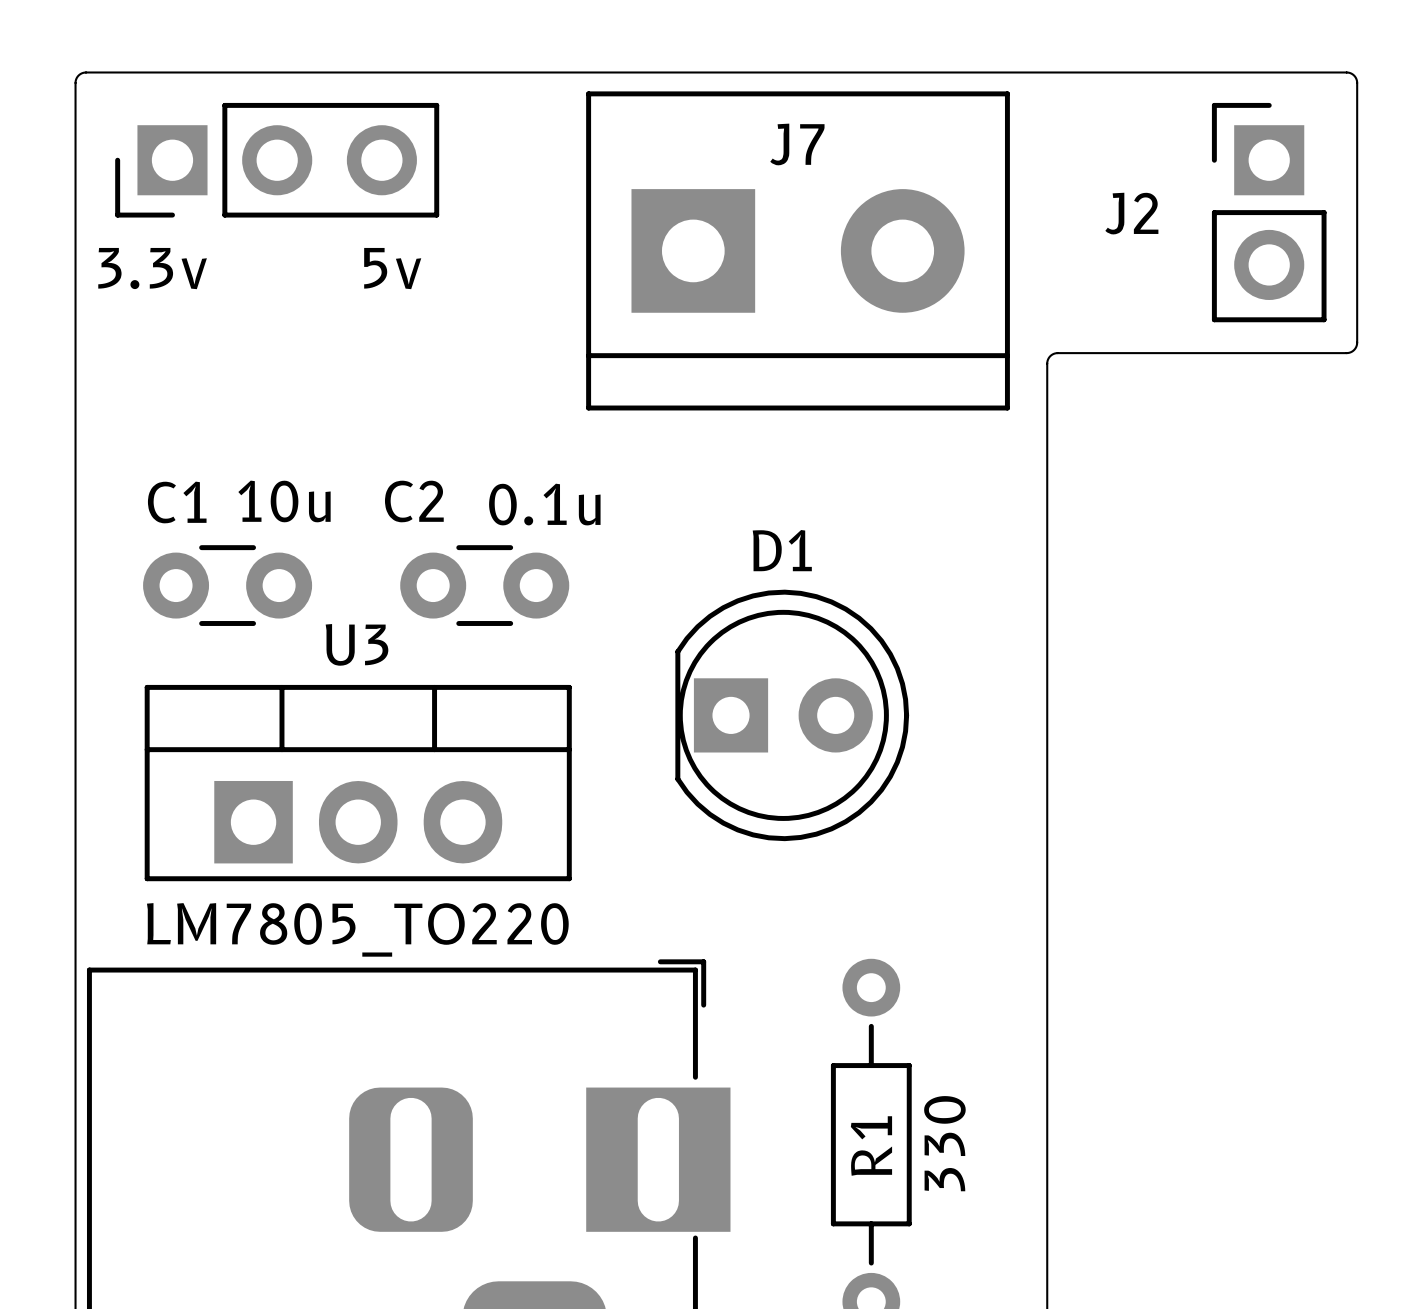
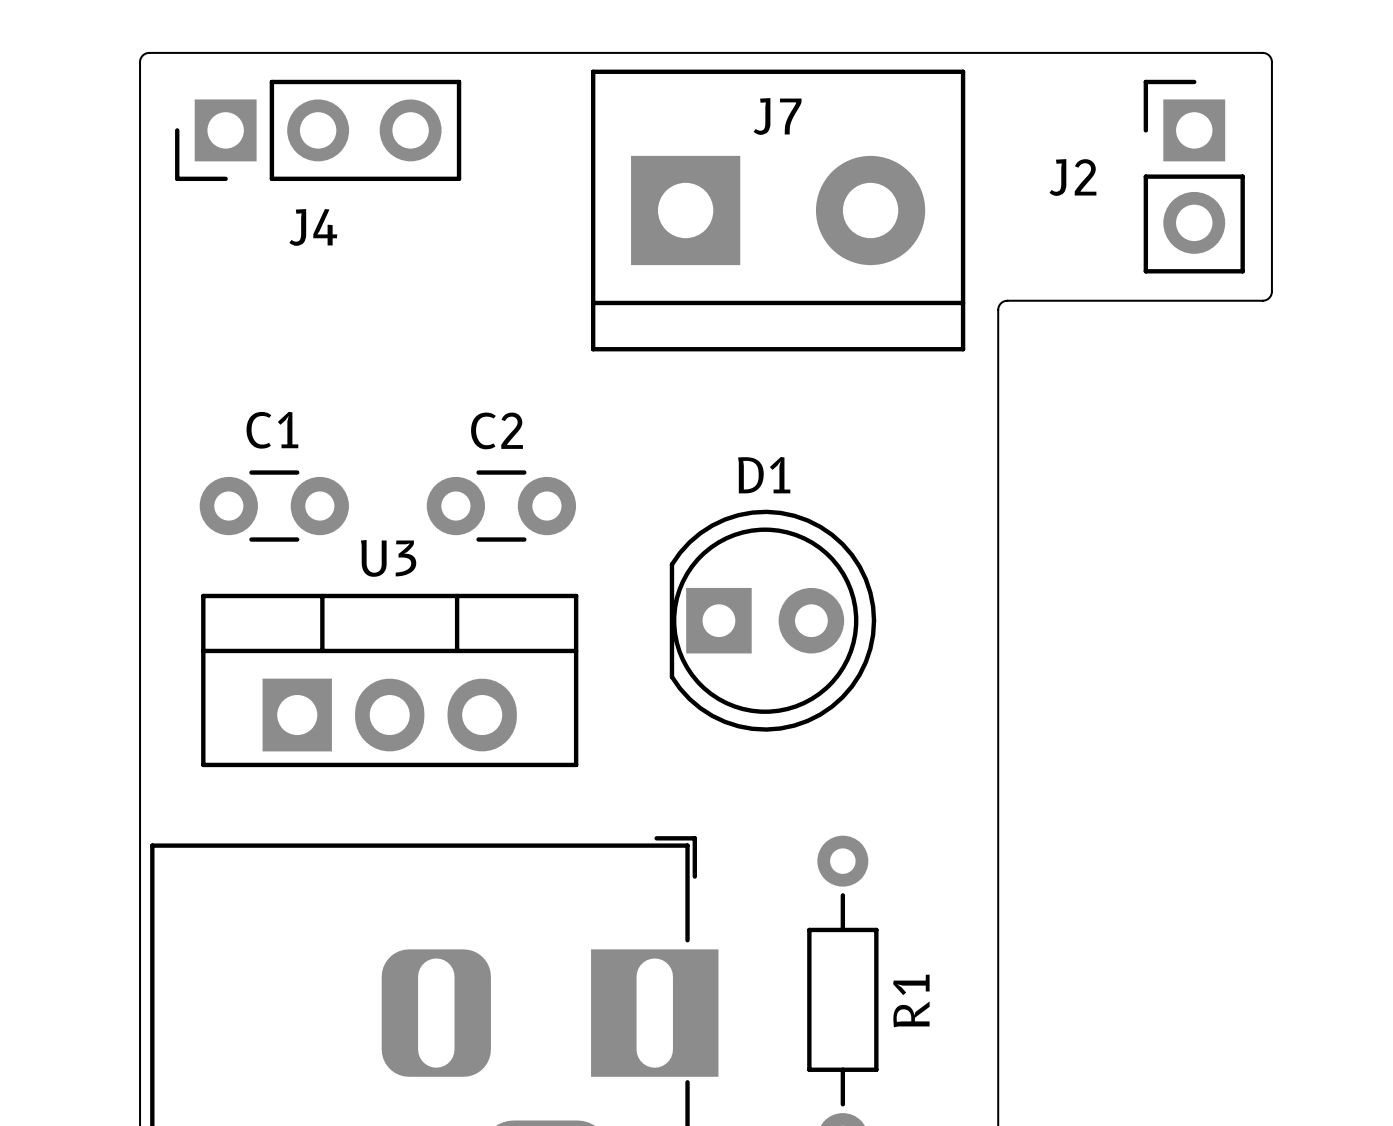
text: 3.3v (152, 268) -> none
text: 5v (392, 268) -> none
J4 name: none -> J4 (313, 227)
C1 value: 10u (284, 501) -> none
C2 name position: C2 (414, 501) -> C2 (496, 430)
C1 name position: C1 (177, 502) -> C1 (272, 430)
C2 value: 0.1u (544, 504) -> none
U3 value: LM7805_TO220 (357, 929) -> none
R1 value: 330 (944, 1143) -> none
R1 name position: R1 (871, 1146) -> R1 (911, 1000)

